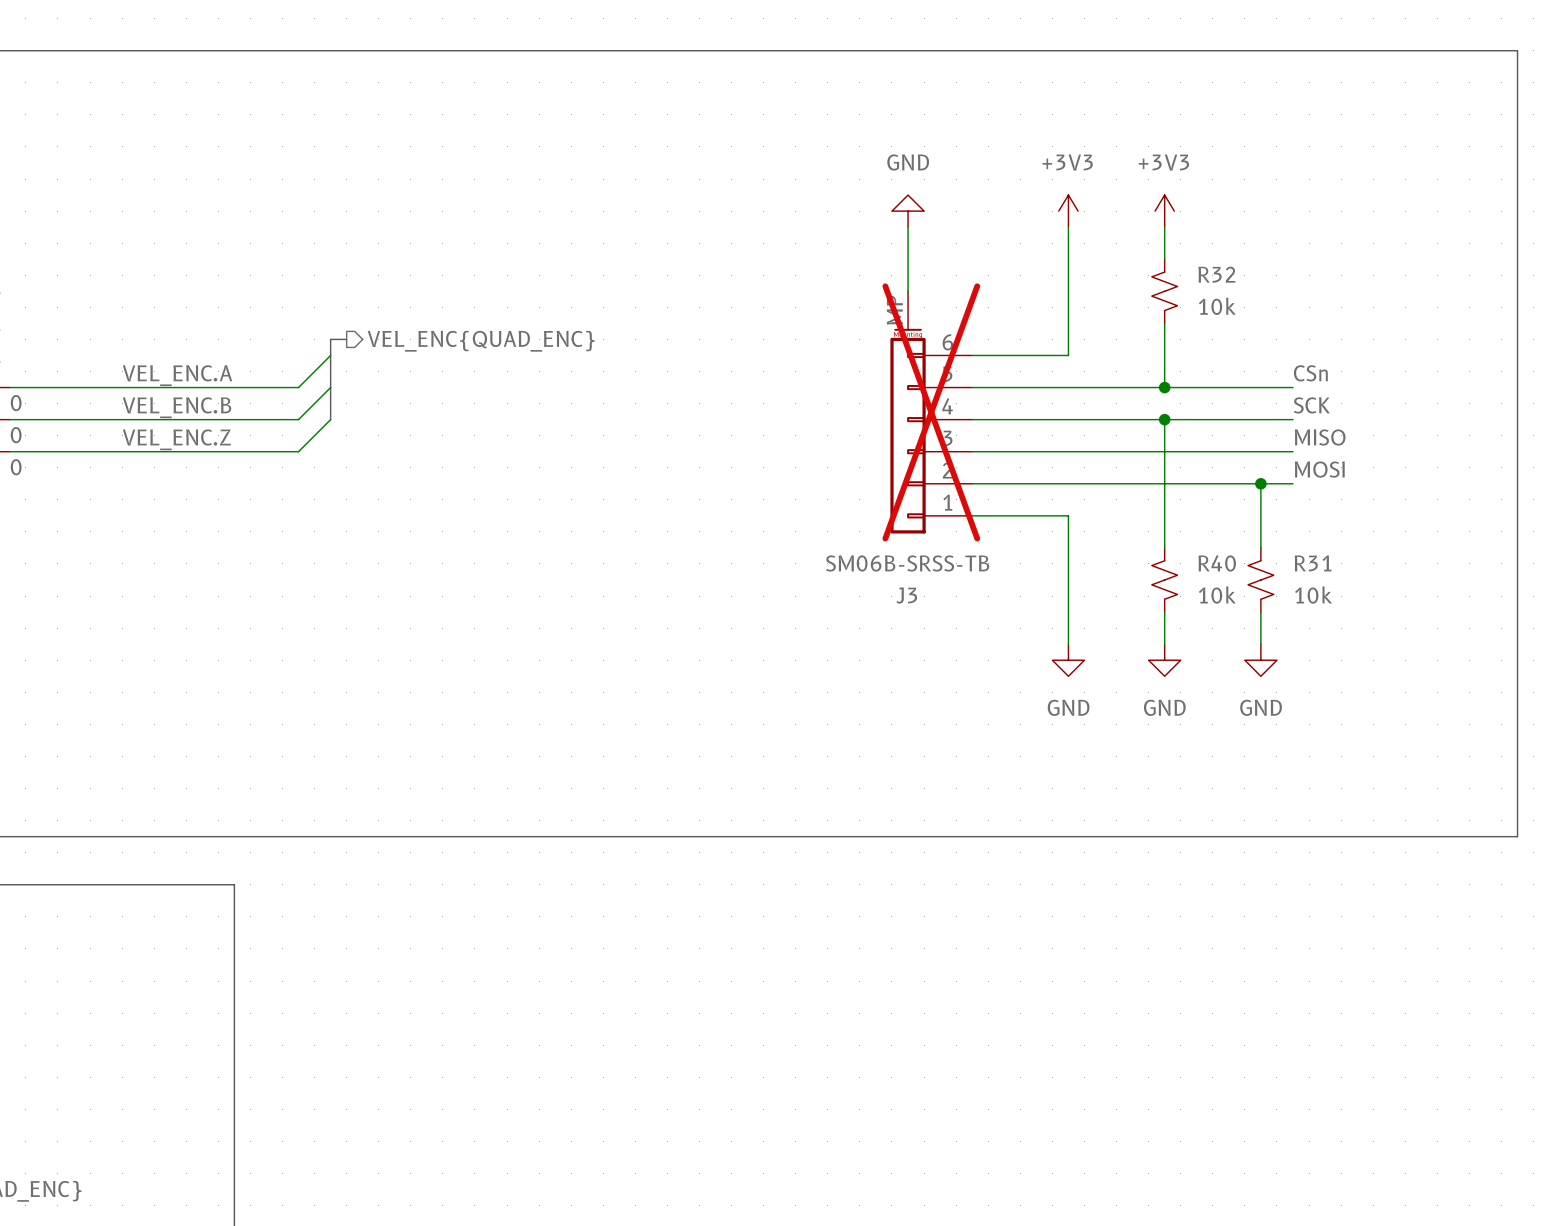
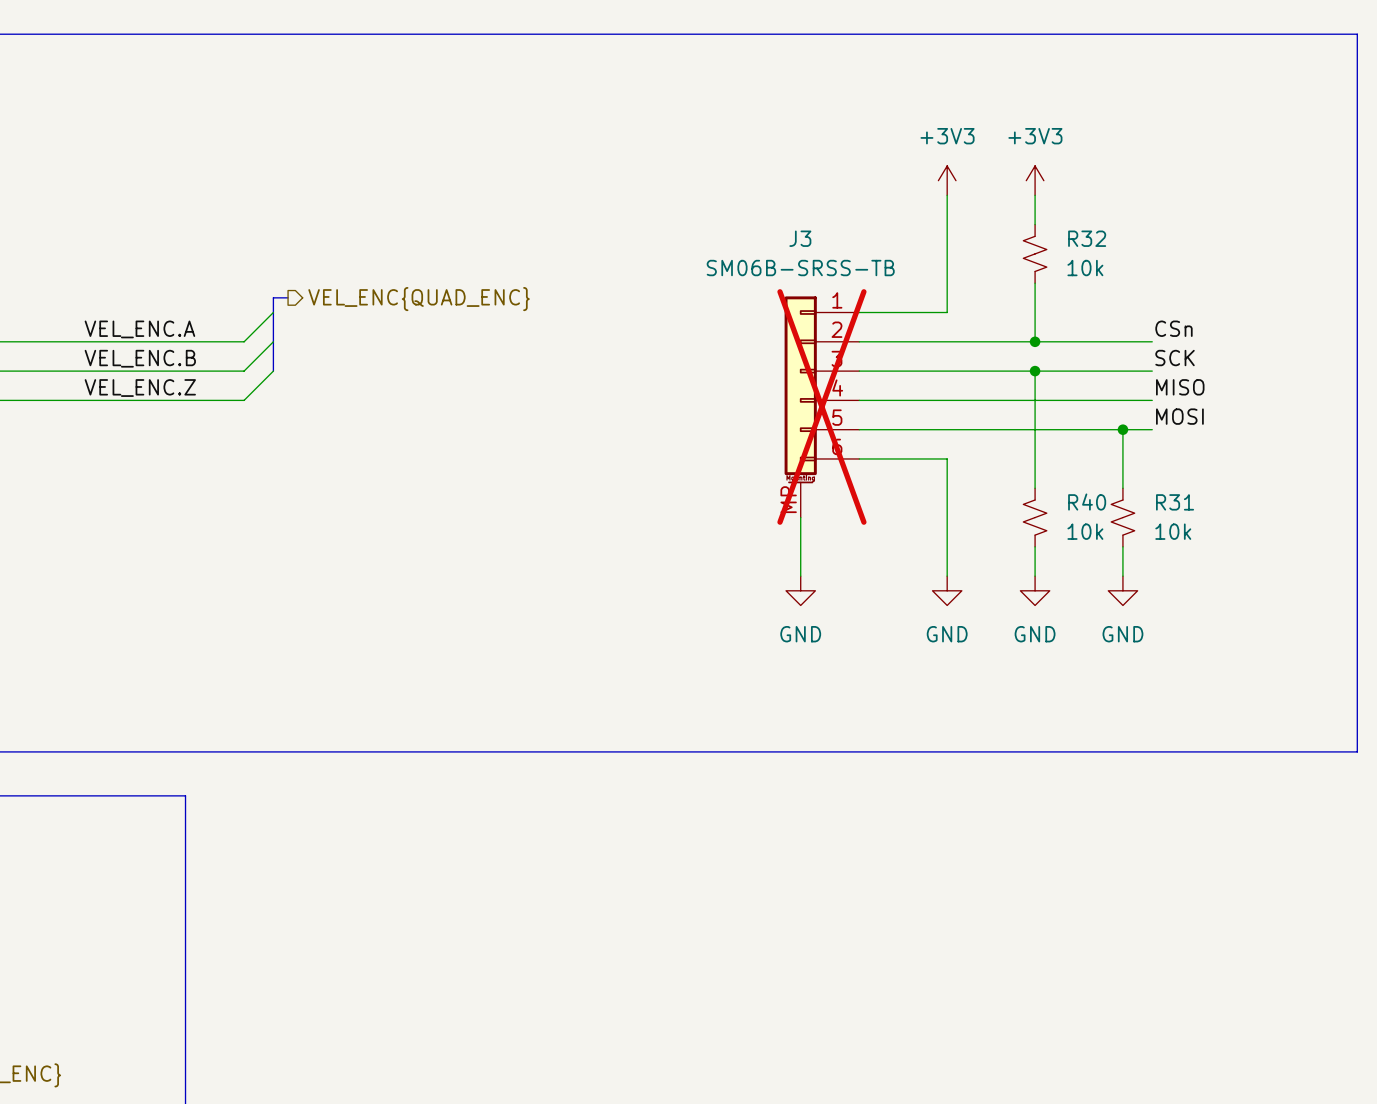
power symbol: GND (908, 211) -> none
wire: (908, 227) (908, 291) -> none
J3 flip: as is (908, 431) -> up-down (800, 389)
wire: none -> (800, 517) (800, 576)
power symbol: none -> GND (800, 590)

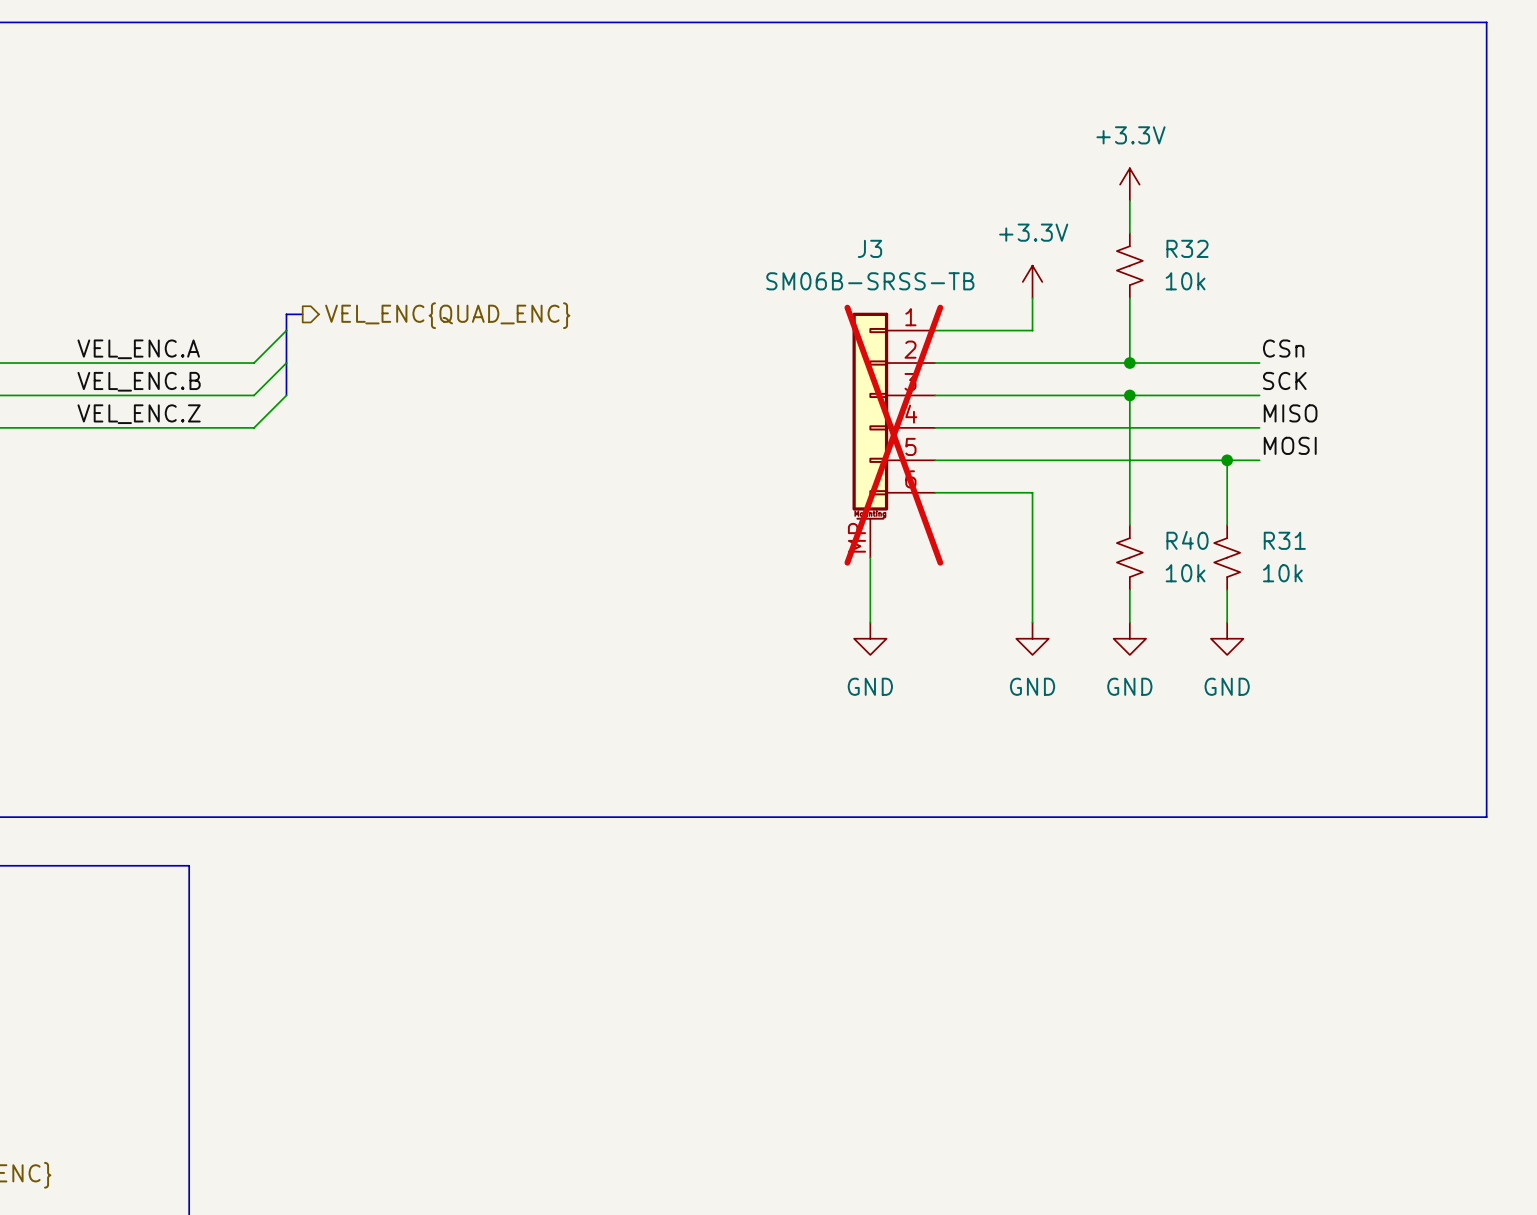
power symbol: +3V3 (947, 180) -> none
power symbol: +3V3 (1035, 180) -> +3.3V (1129, 184)
wire: (947, 195) (947, 283) -> none
power symbol: none -> +3.3V (1032, 281)

